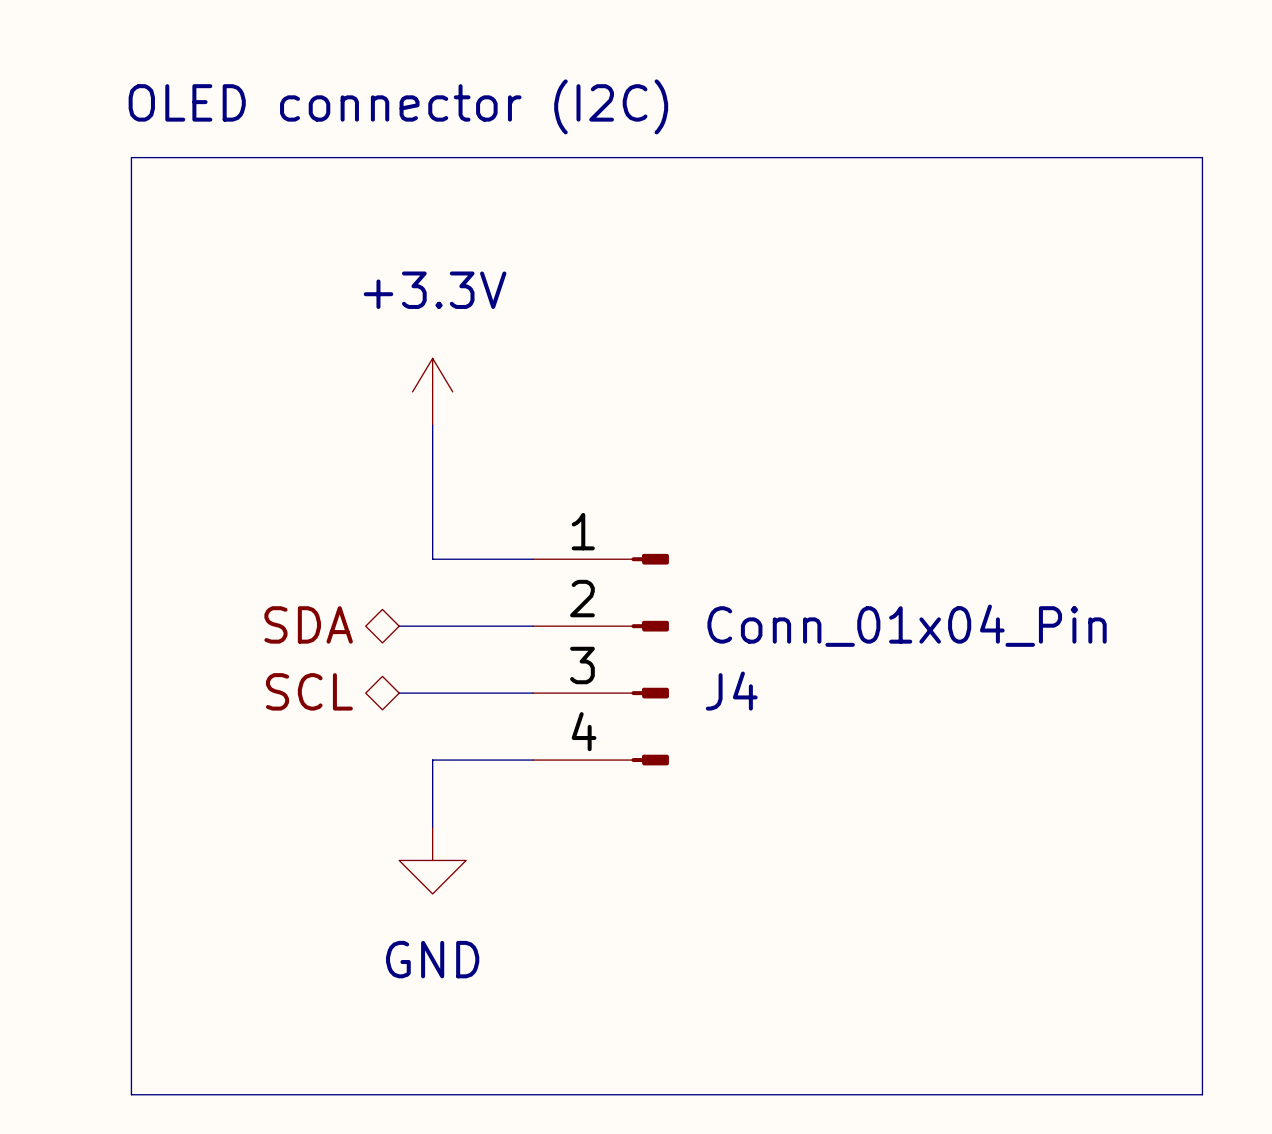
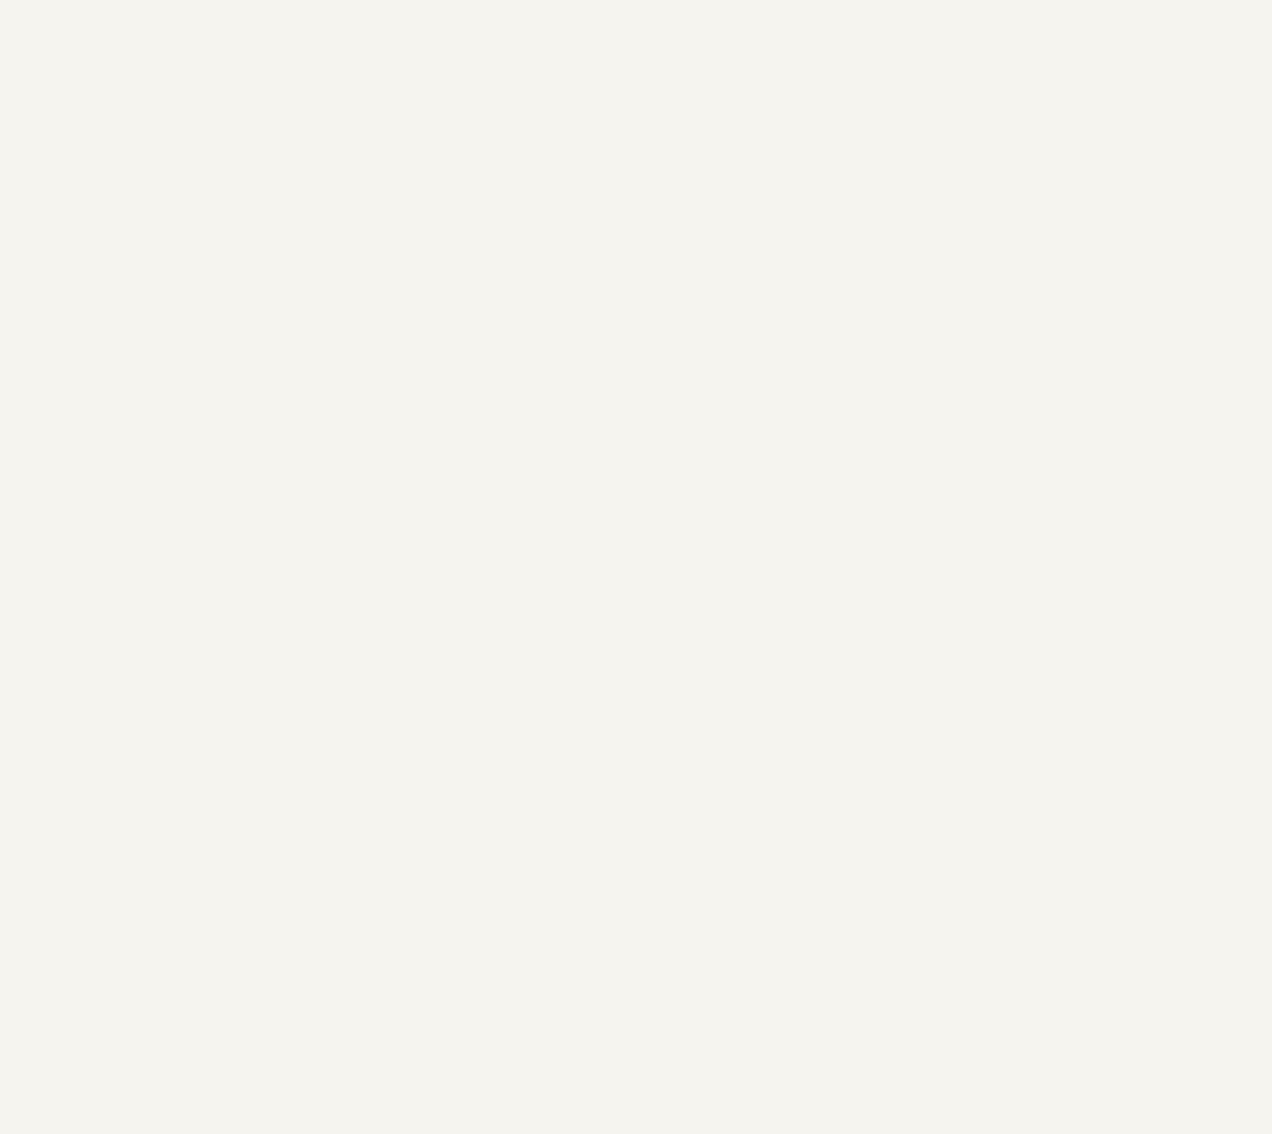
text: OLED connector (I2C) (398, 106) -> none
line: (131, 157) (1202, 157) (1202, 1094) (131, 1094) (131, 157) -> none
power symbol: +3.3V (432, 391) -> none
wire: (432, 425) (432, 559) (533, 559) -> none
hierarchical label: SDA (308, 624) -> none
wire: (399, 626) (533, 626) -> none
J4: Conn_01x04_Pin (601, 659) -> none
hierarchical label: SCL (309, 691) -> none
wire: (399, 693) (533, 693) -> none
wire: (533, 760) (432, 760) (432, 826) -> none
power symbol: GND (432, 860) -> none

